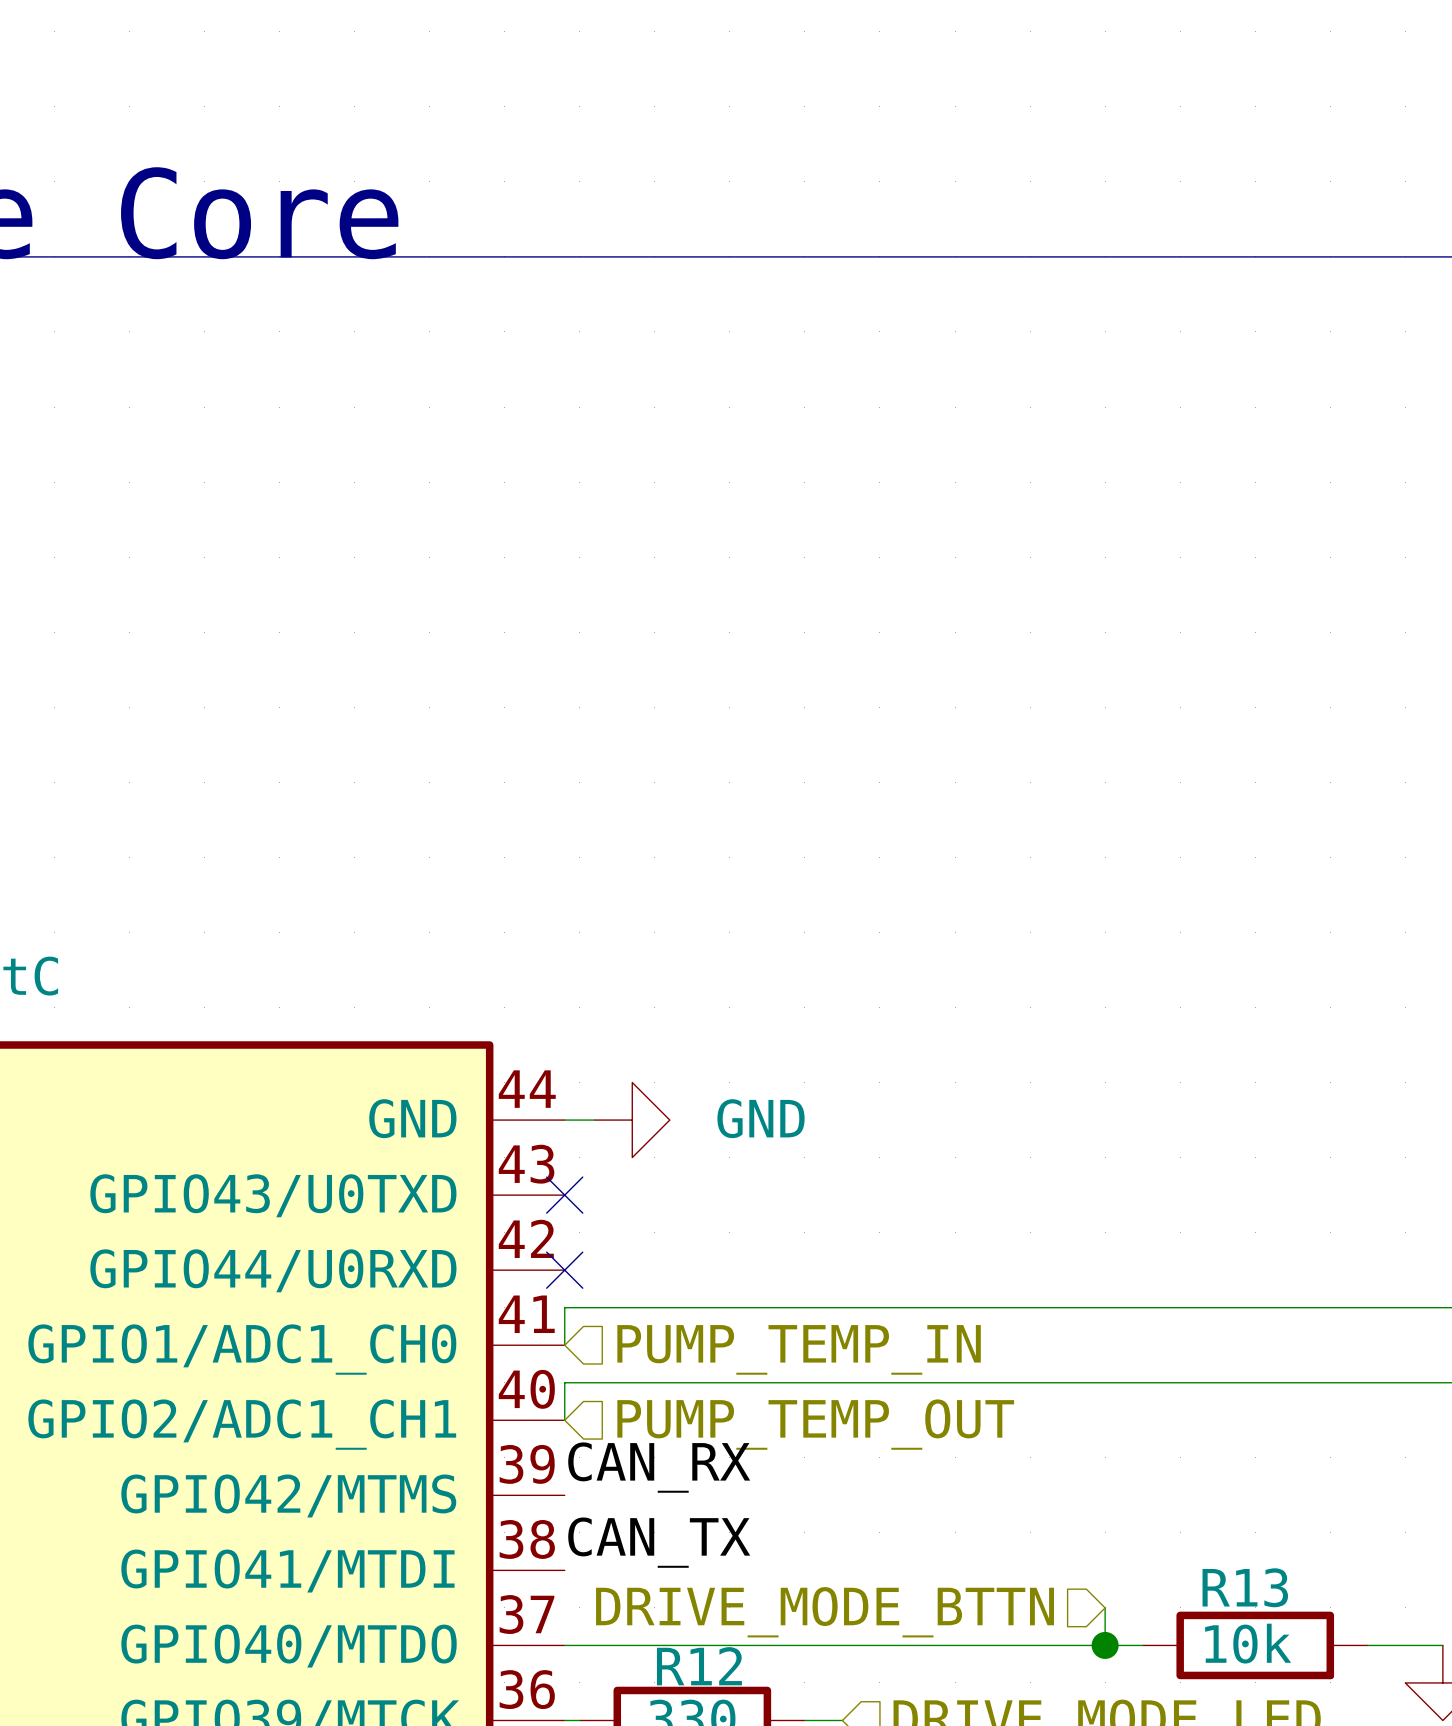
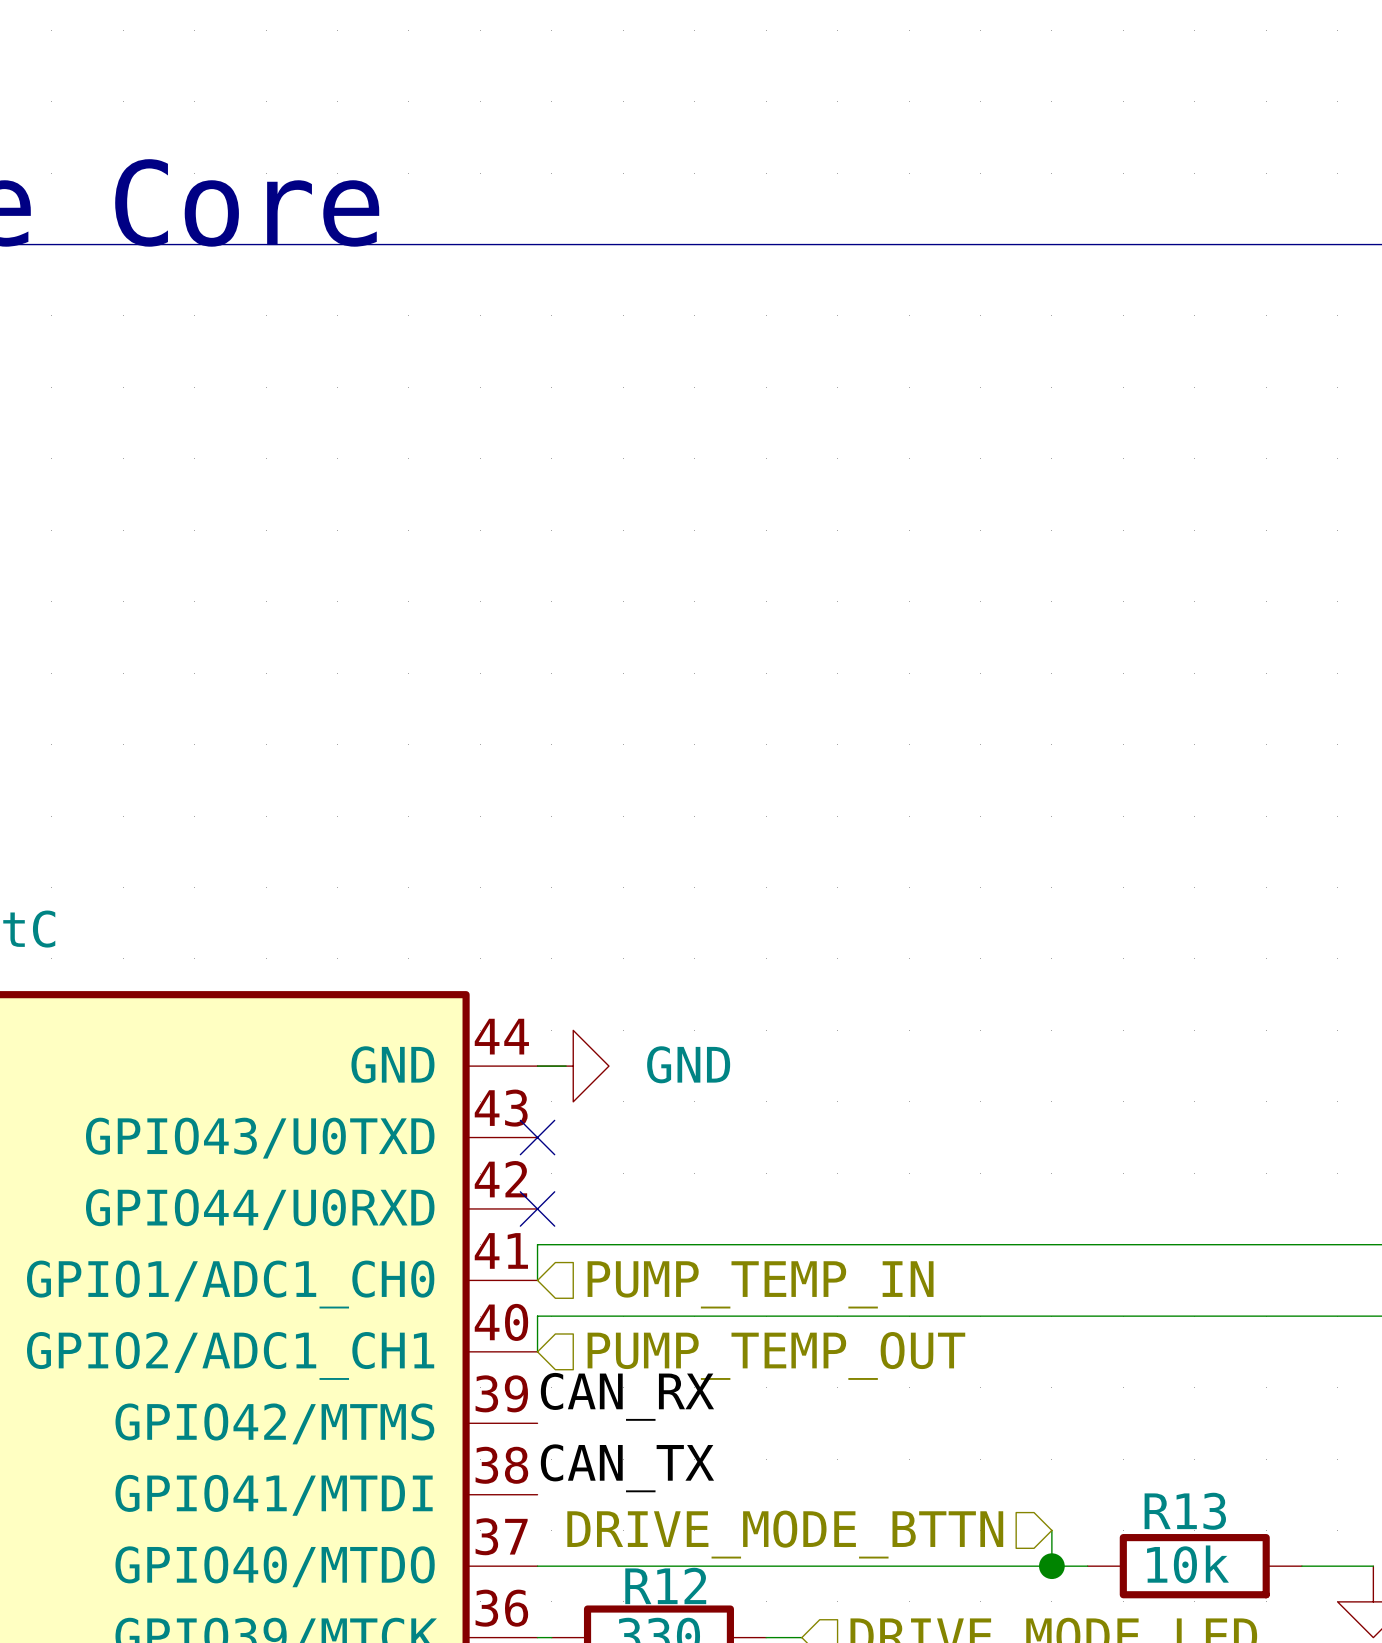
power symbol text position: GND (761, 1118) -> GND (688, 1064)
power symbol position: GND (632, 1120) -> GND (573, 1066)

